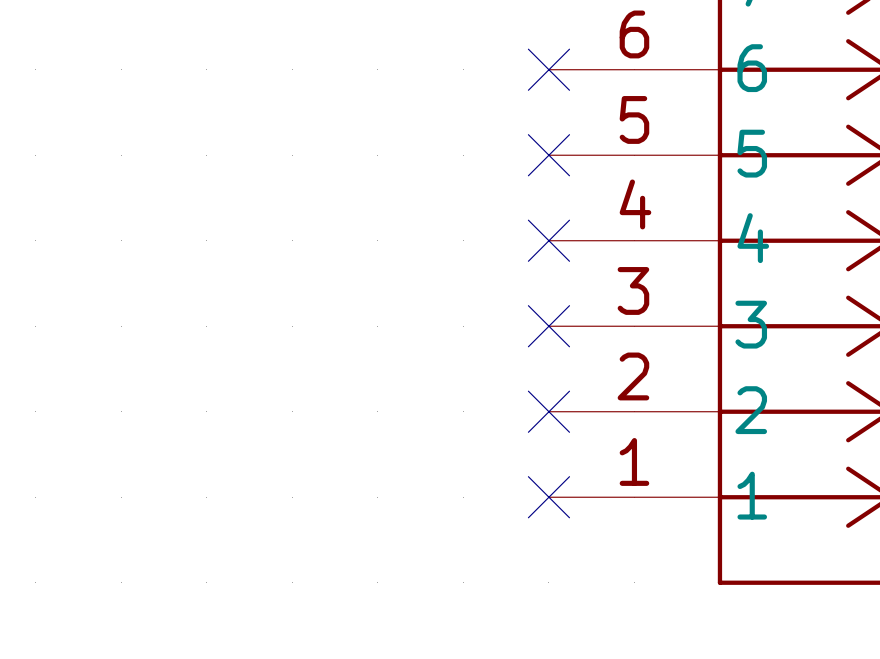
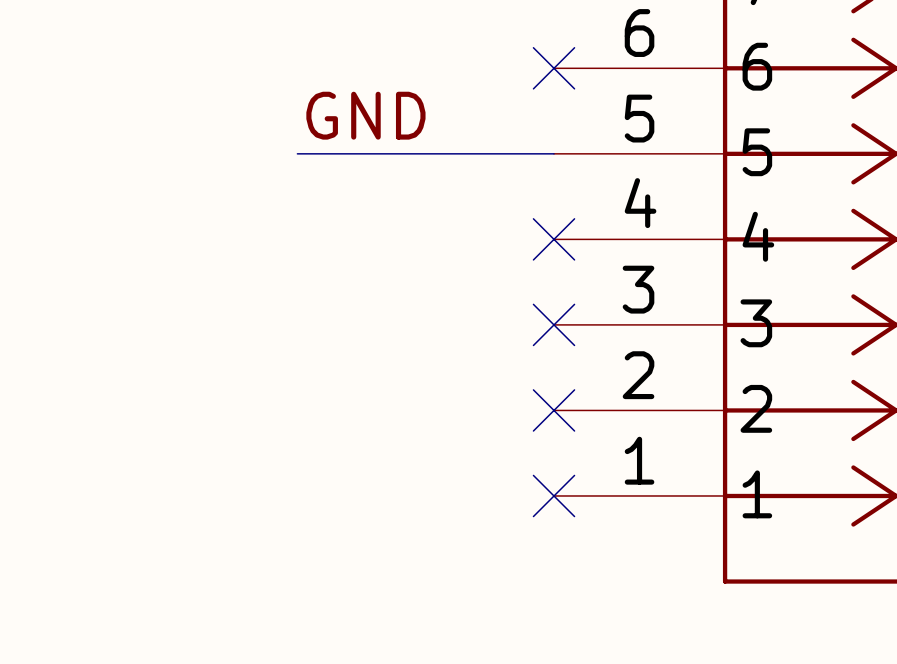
label: none -> GND (365, 115)
wire: none -> (297, 153) (554, 153)
no-connect mark: (548, 155) -> none

